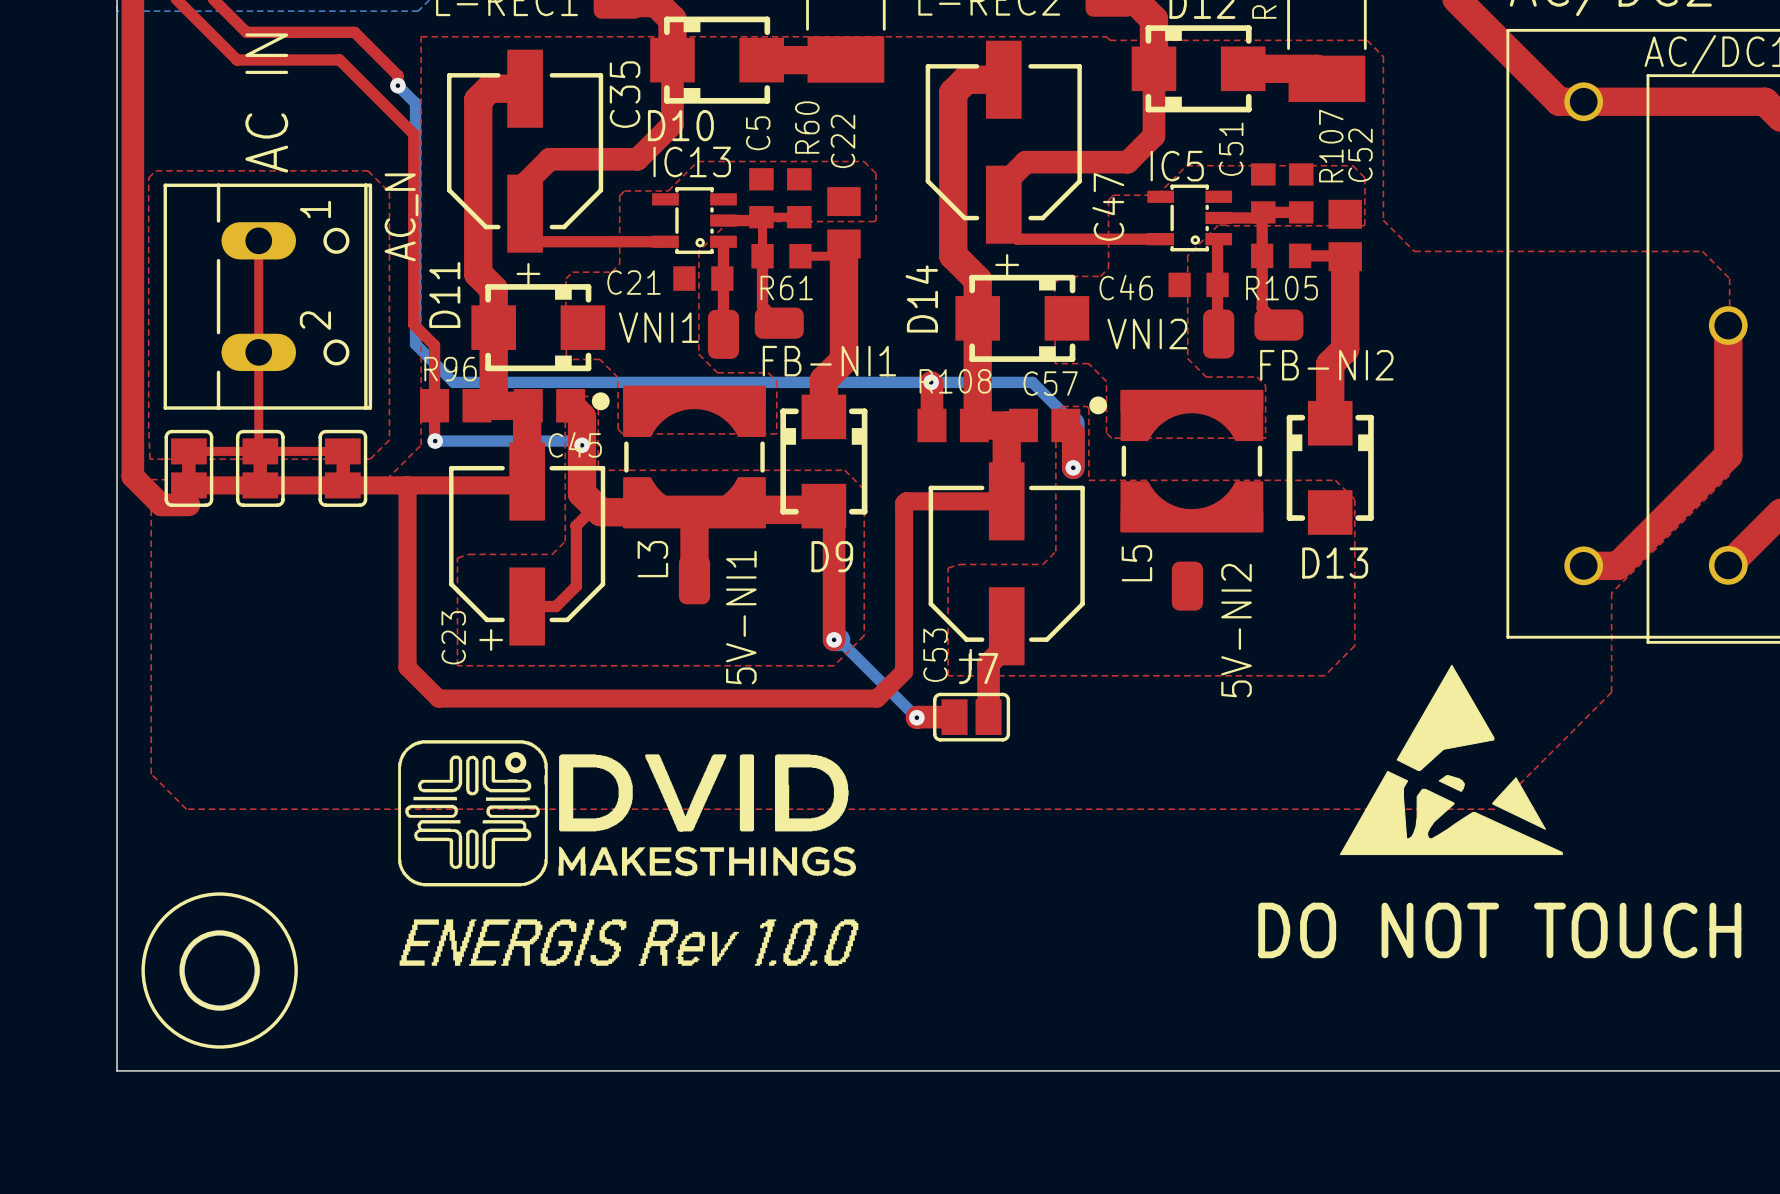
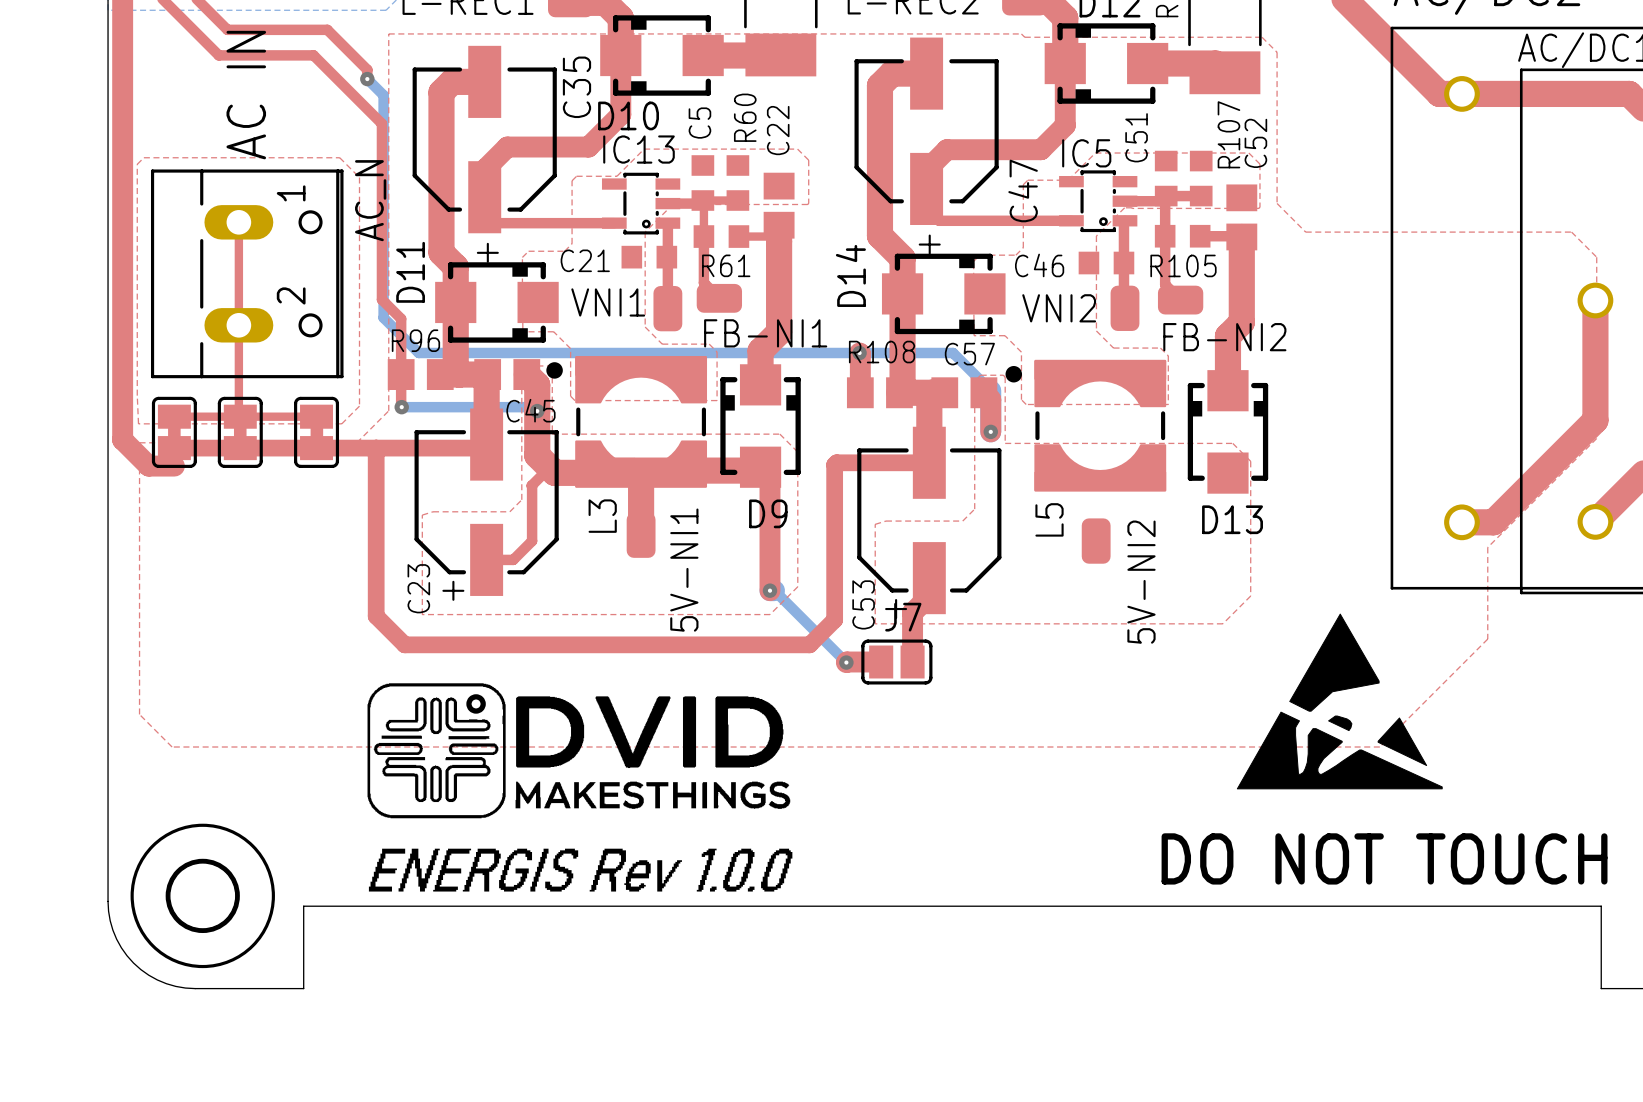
board edge: (117, 976) (117, 1070) (211, 1070) -> (108, 901) (110, 920) (116, 939) (133, 963) (157, 979) (175, 986) (195, 988)
board edge: (328, 1070) (1734, 1070) -> (303, 988) (303, 906) (1601, 906) (1601, 988)

